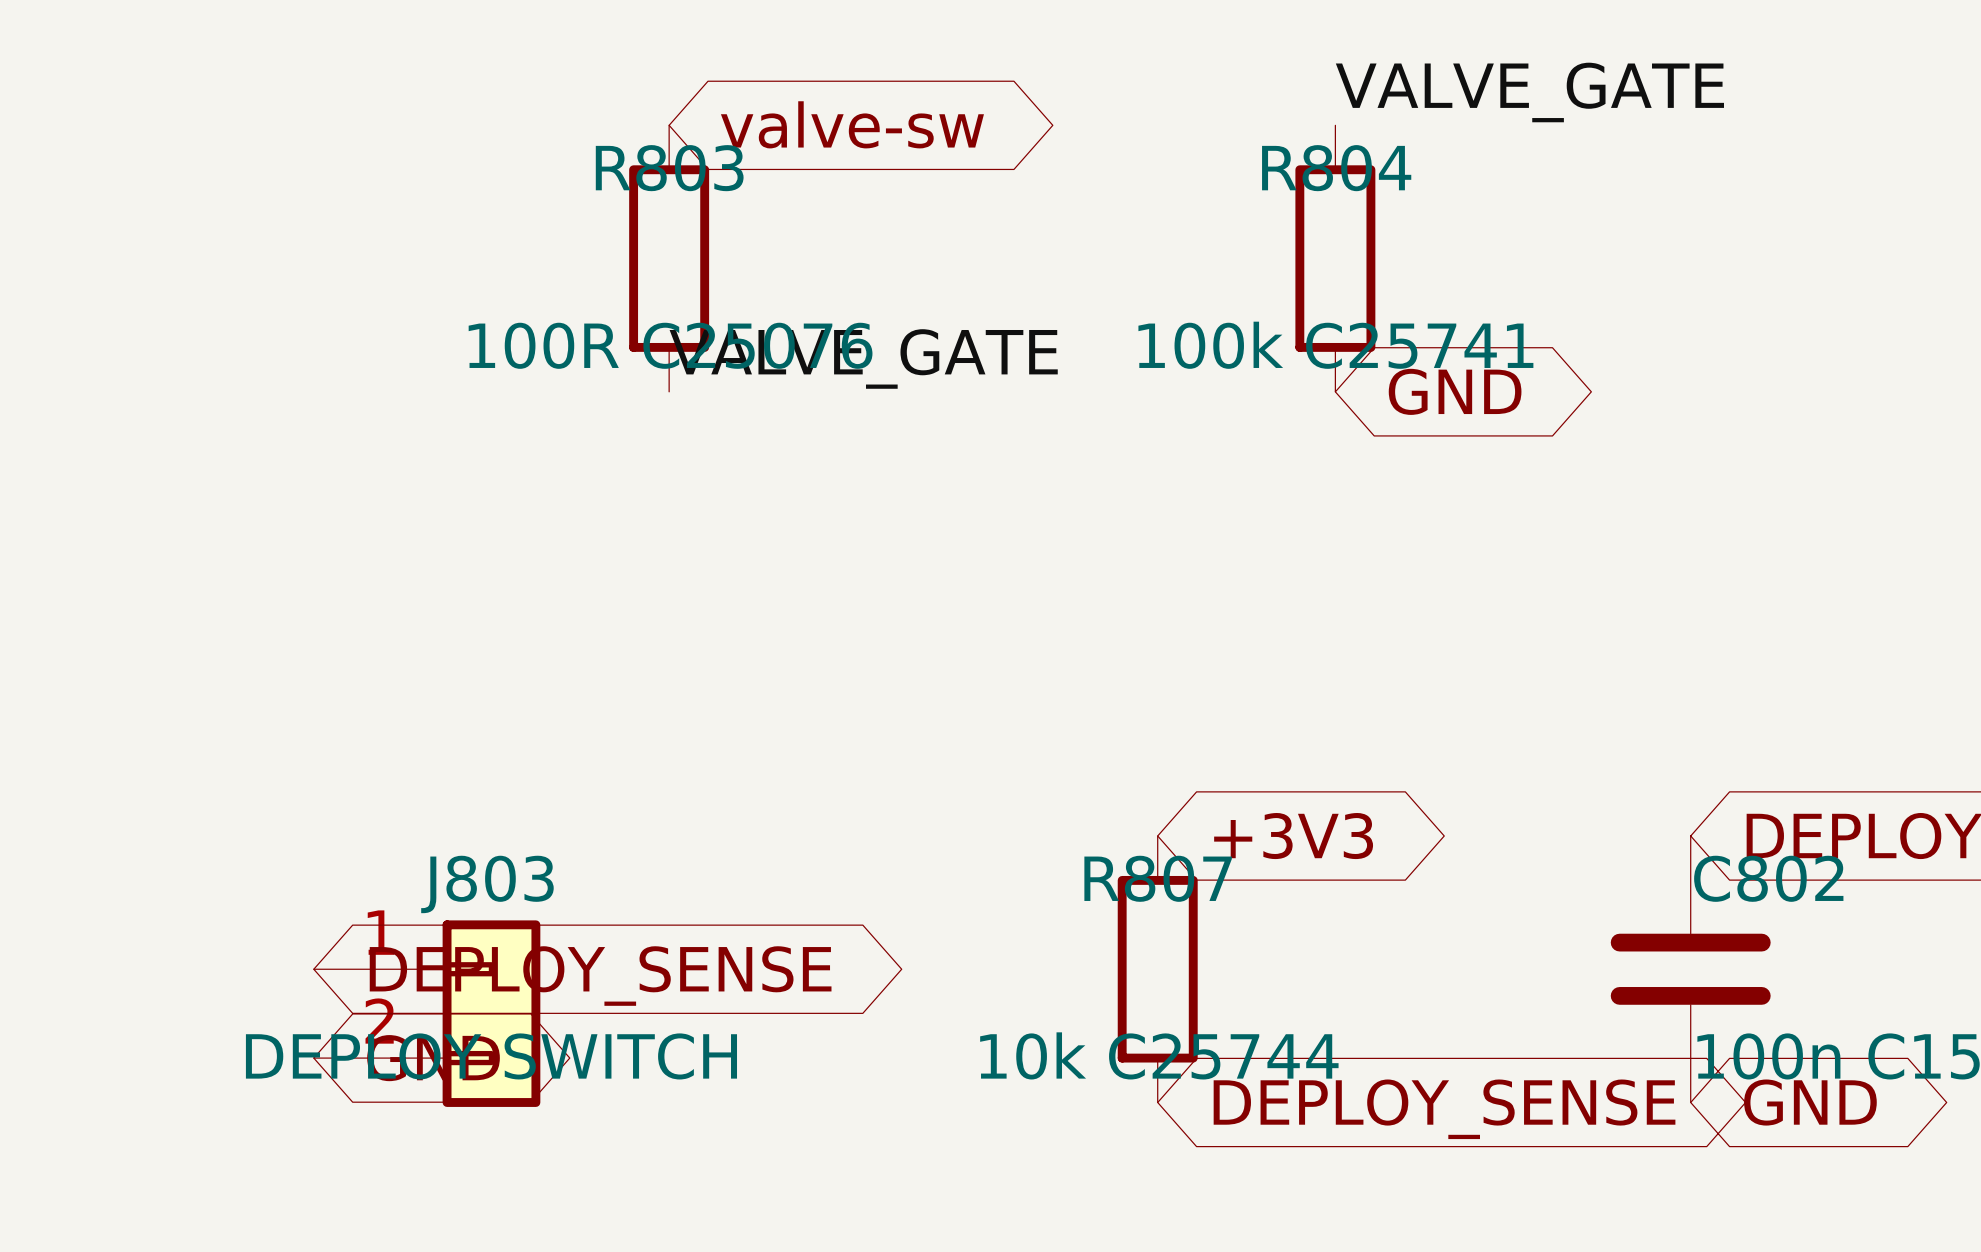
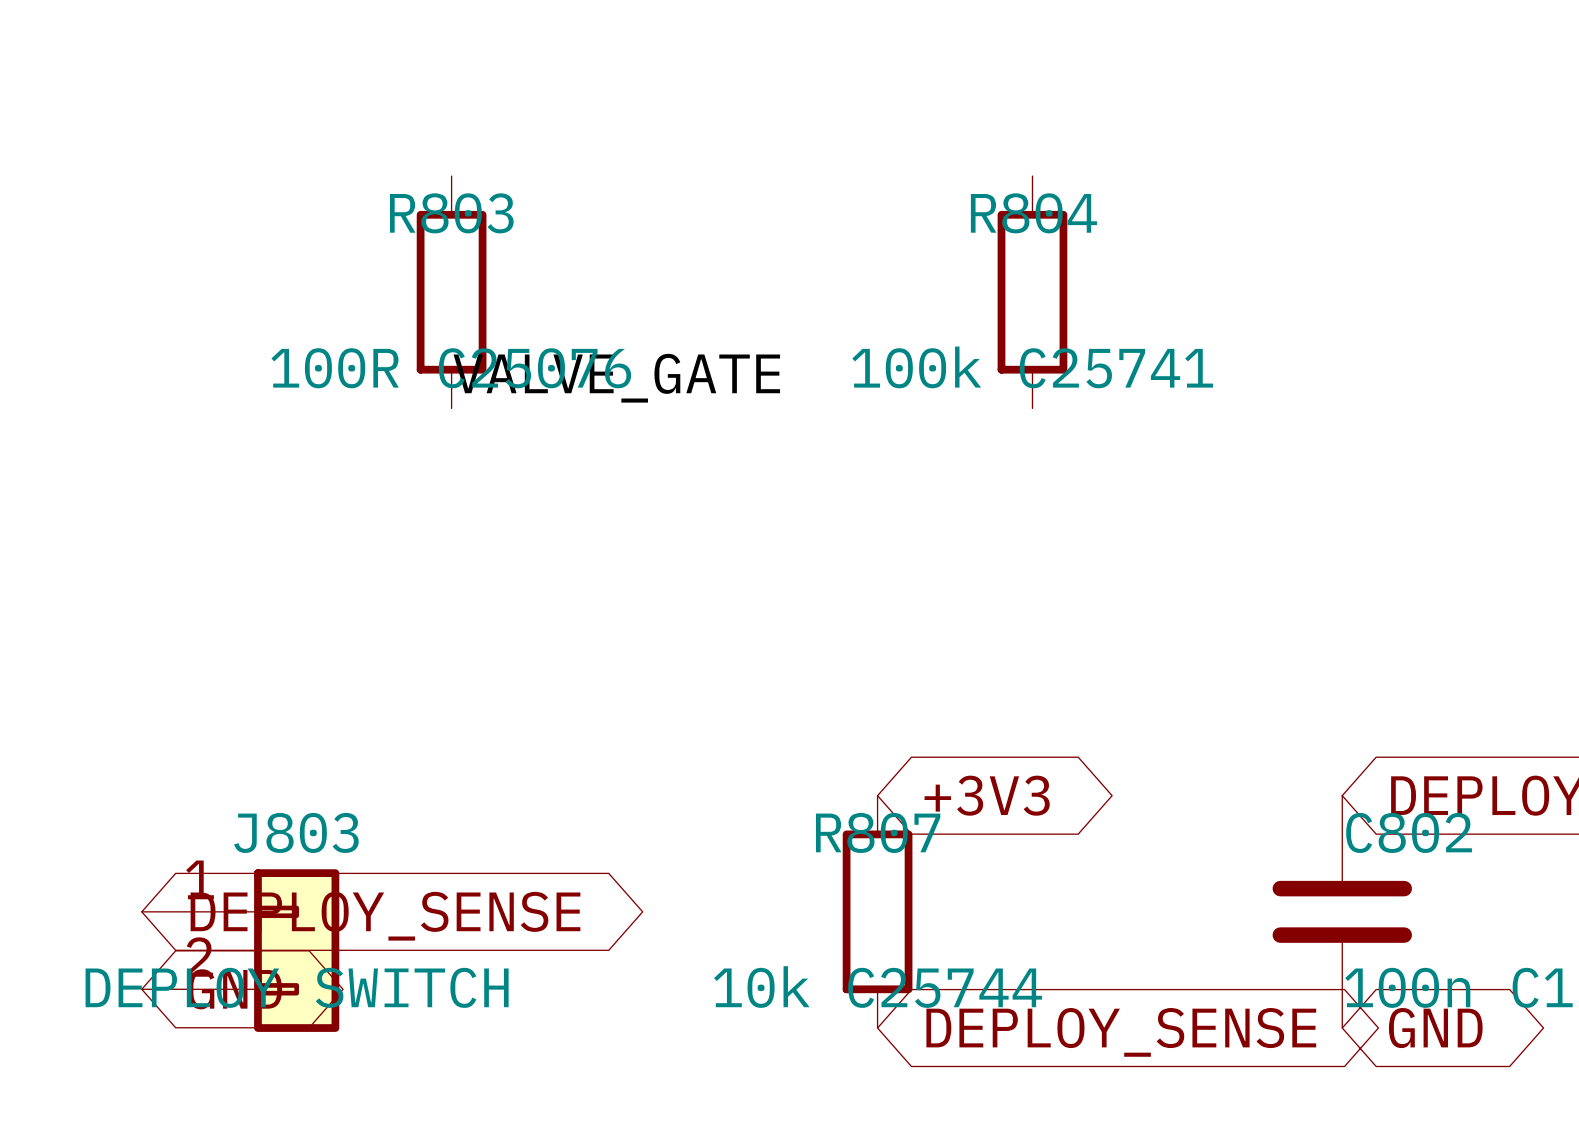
label: VALVE_GATE (1529, 92) -> none
global label: valve-sw (852, 124) -> none
global label: GND (1455, 391) -> none

